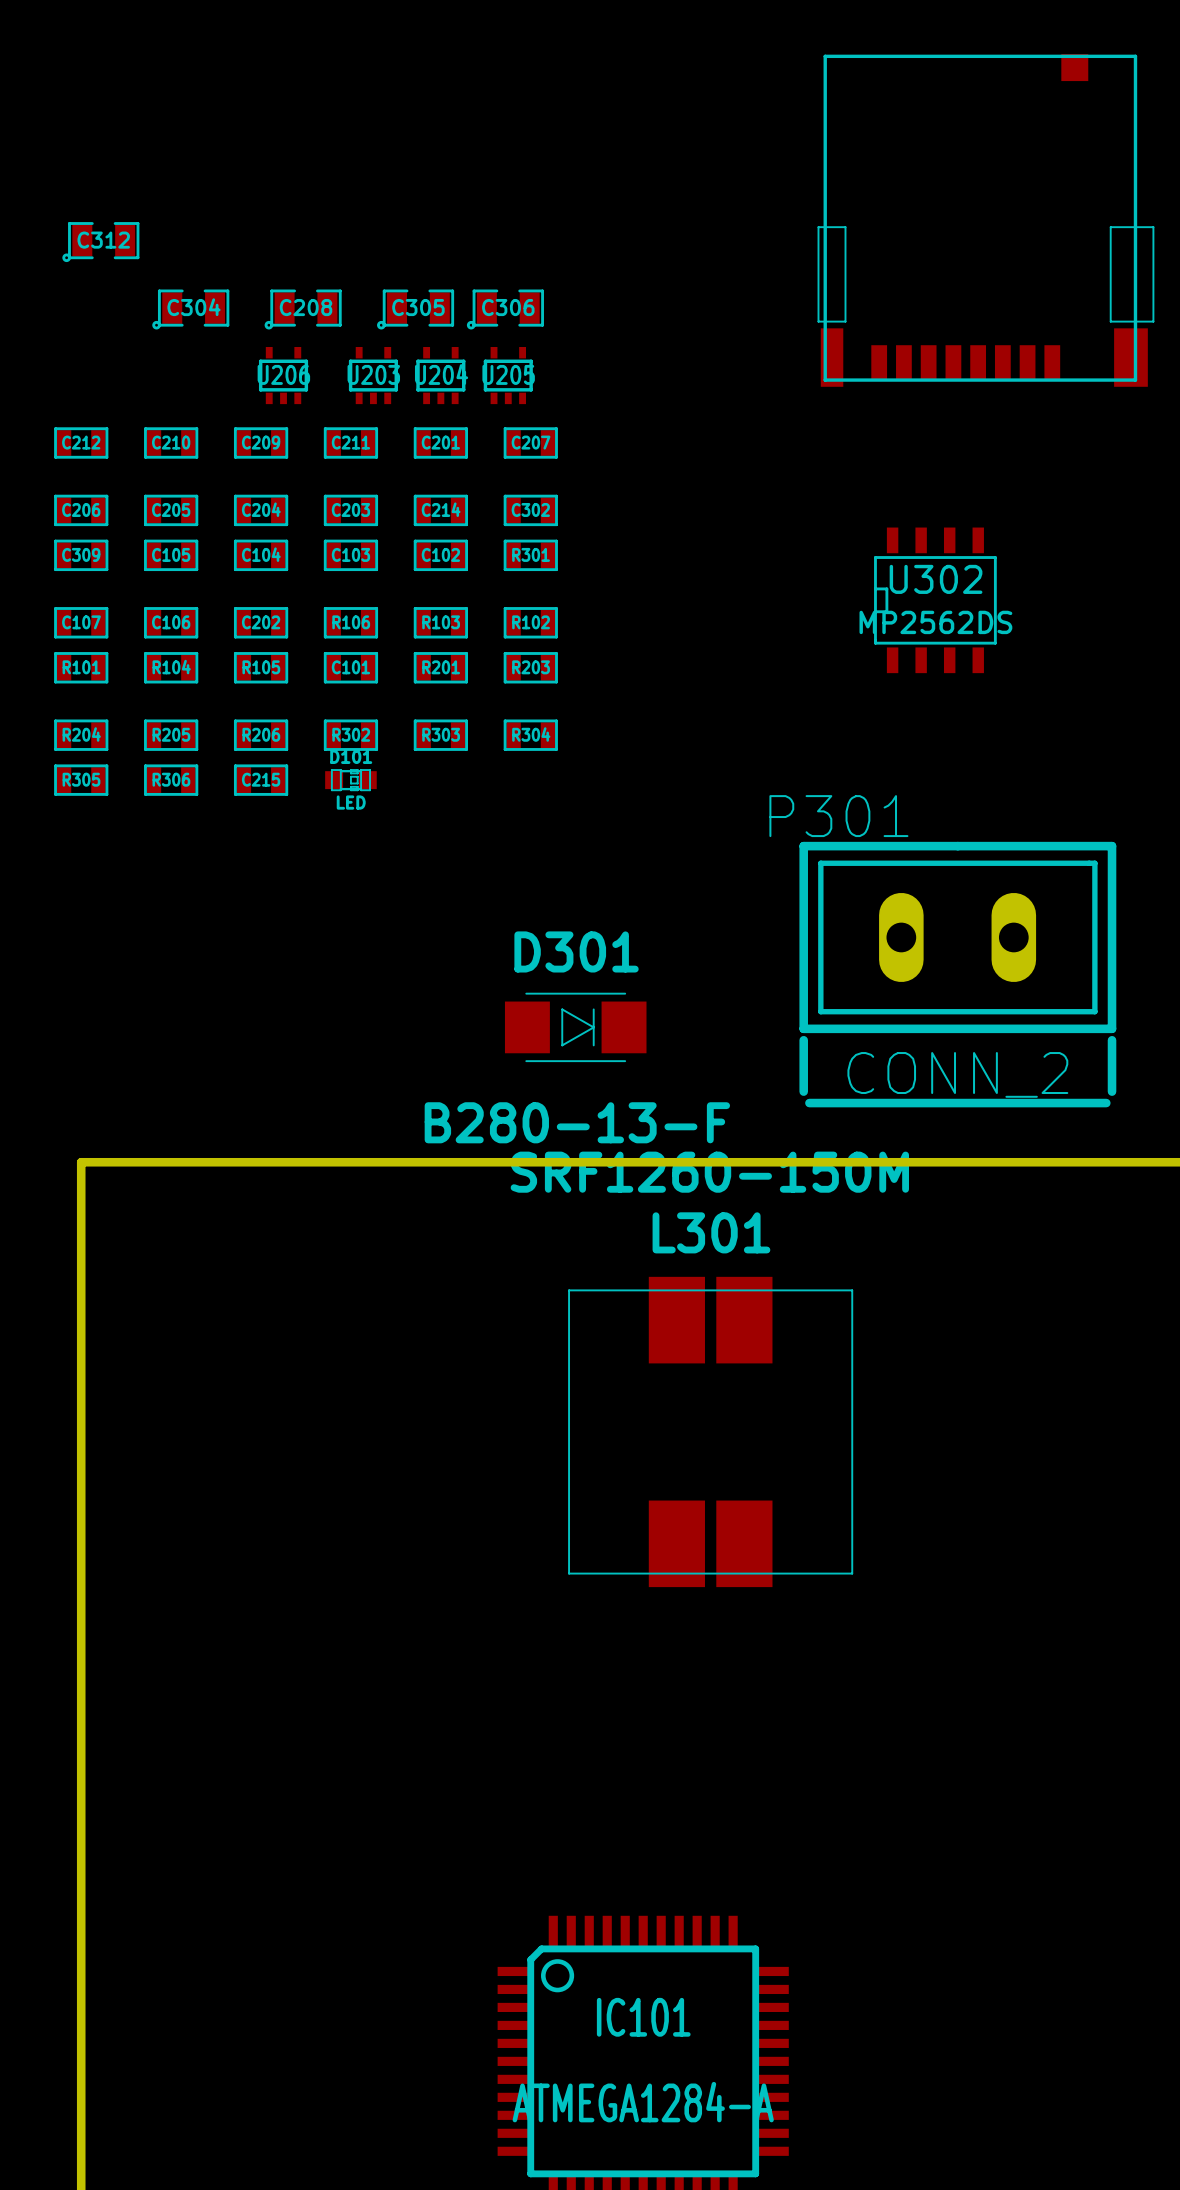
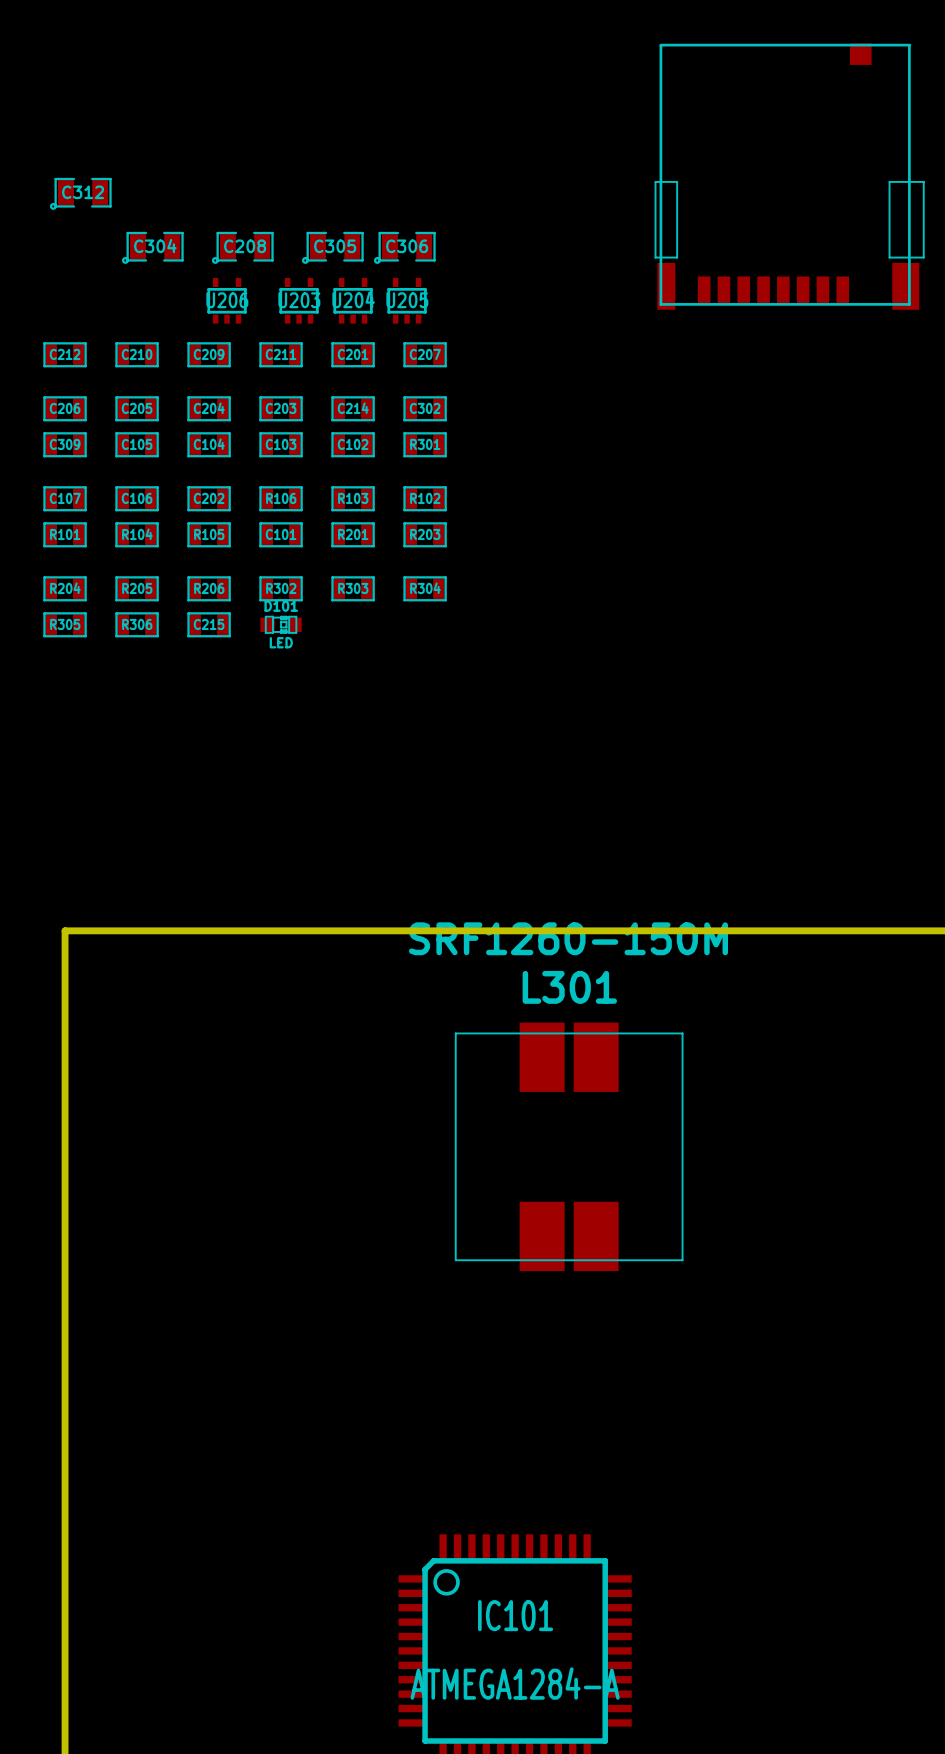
U302: MP2562DS (935, 600) -> none
P301: CONN_2 (957, 974) -> none
D301: B280-13-F (575, 1027) -> none

